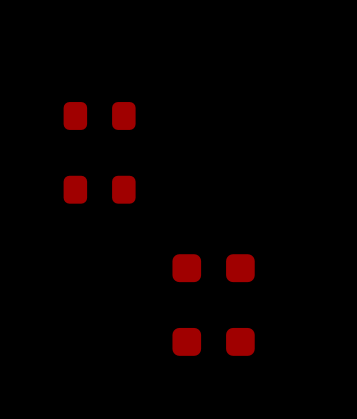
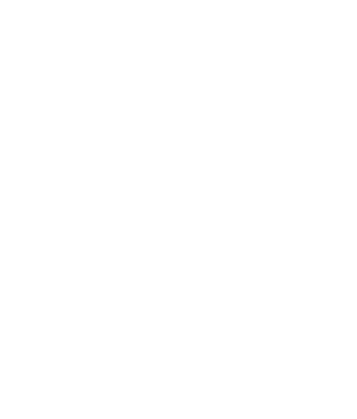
part: (99, 115) -> none
part: (99, 189) -> none
part: (213, 268) -> none
part: (213, 341) -> none

